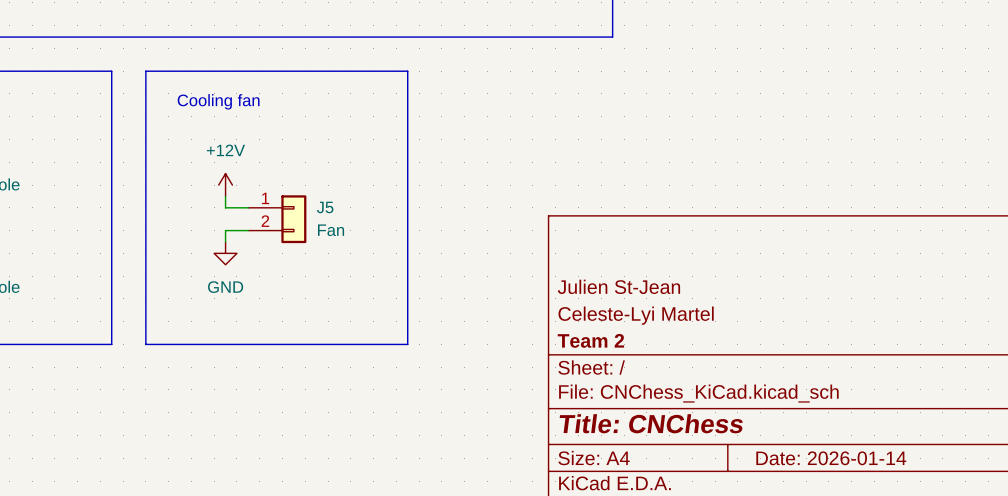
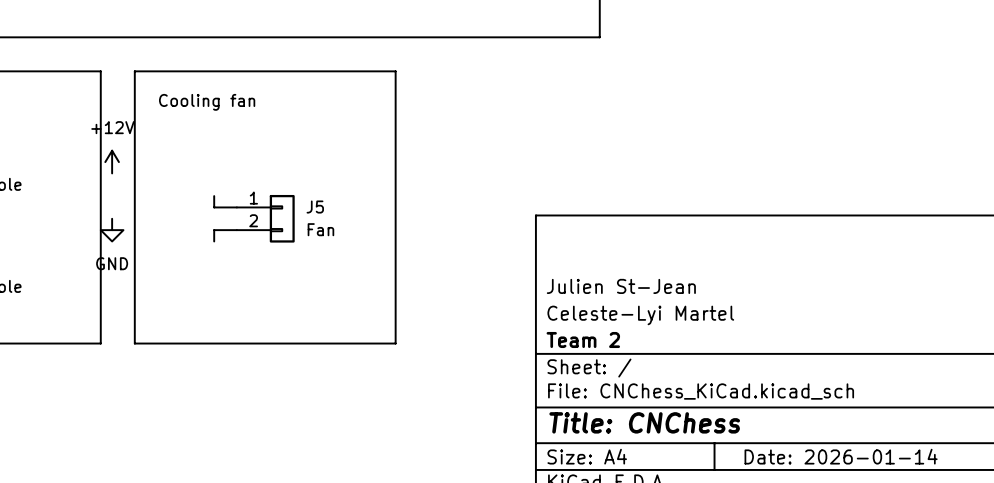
power symbol position: +12V (225, 185) -> +12V (112, 162)
power symbol position: GND (225, 253) -> GND (112, 230)

